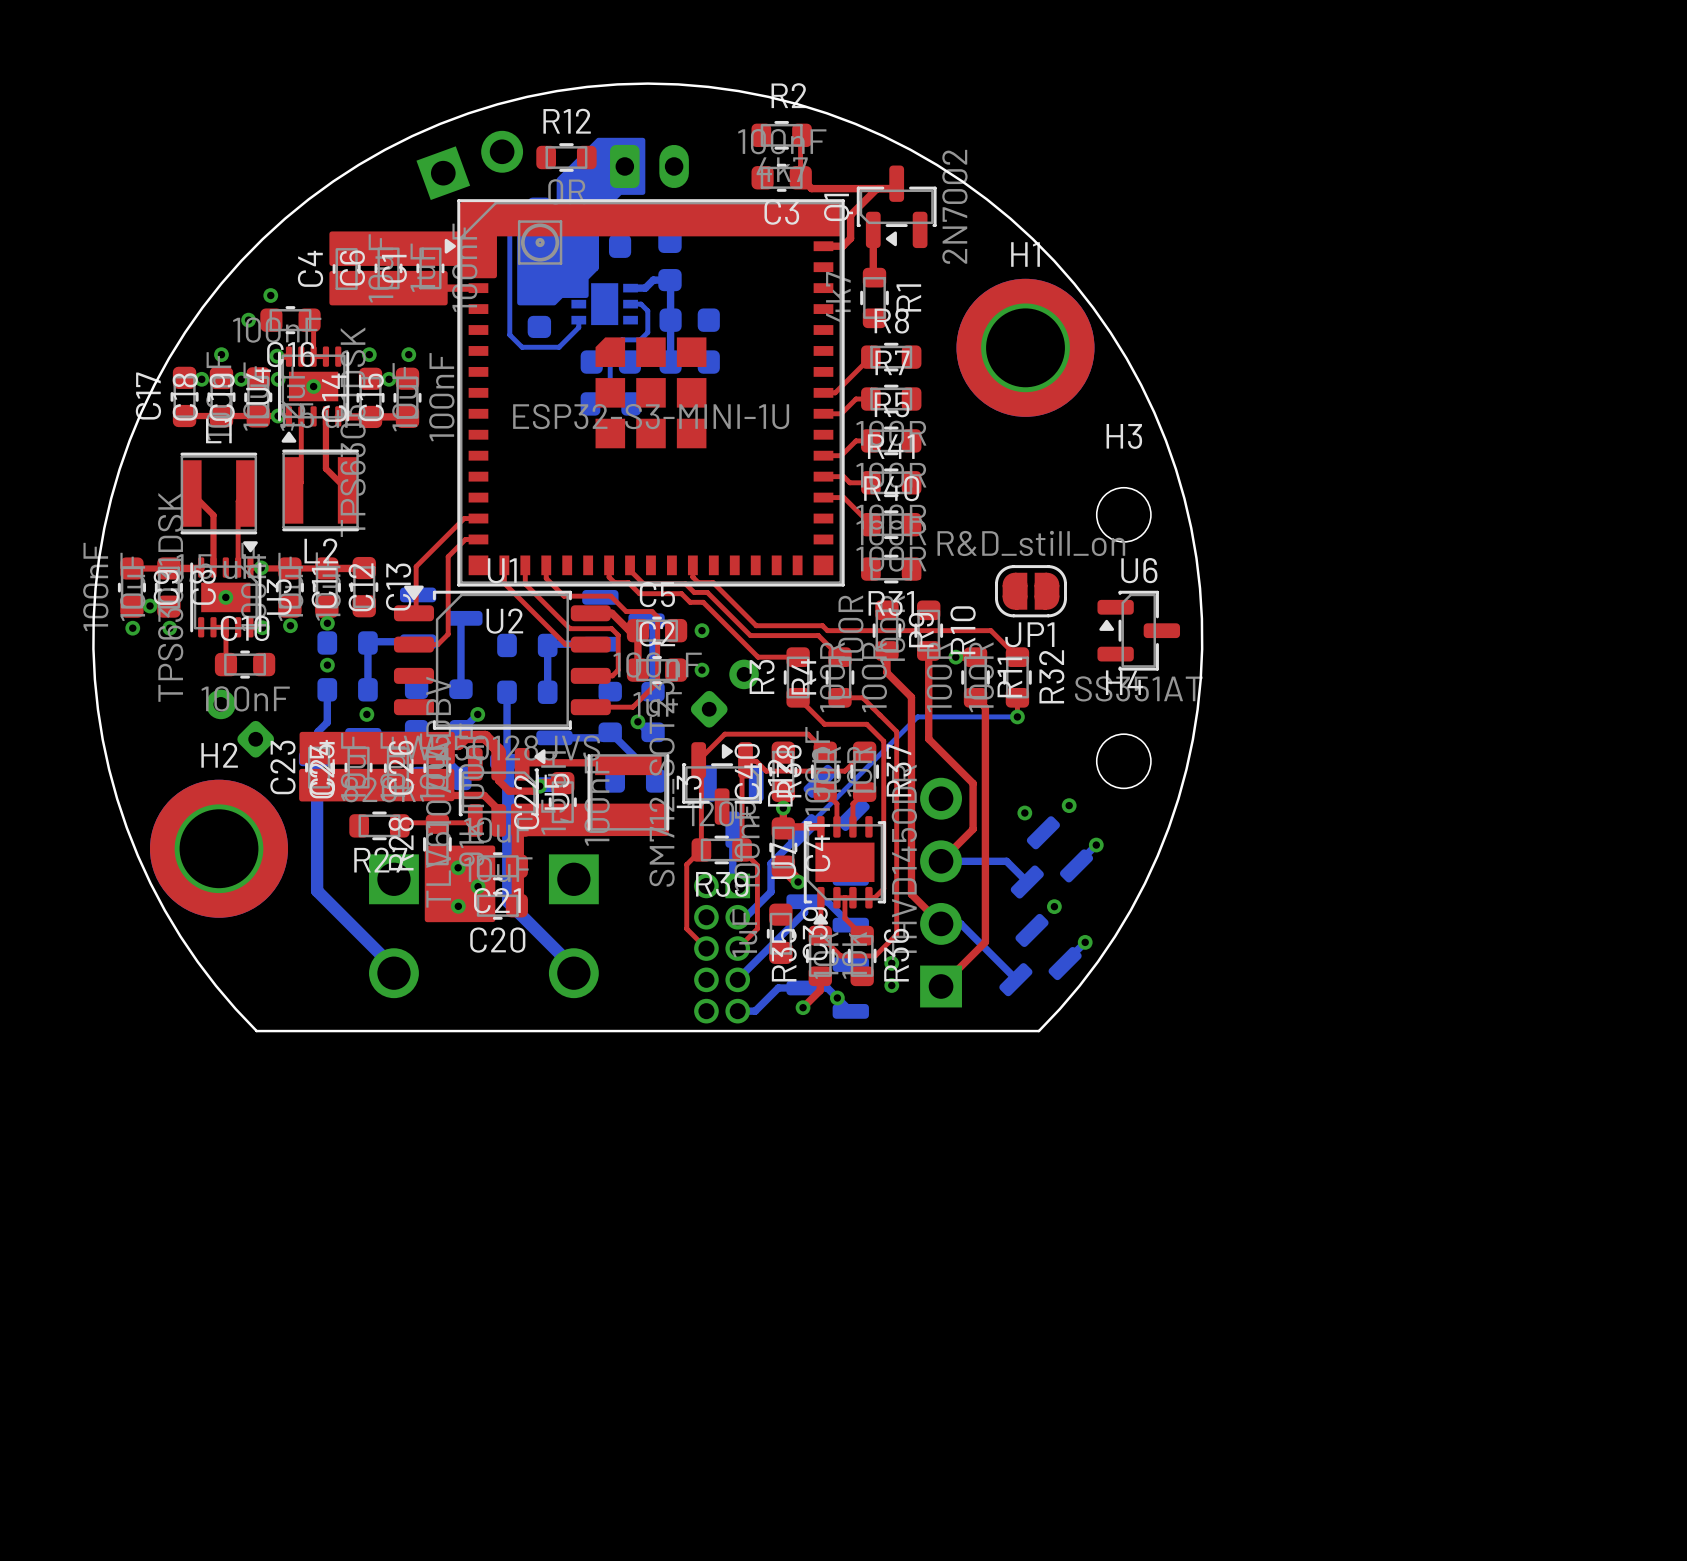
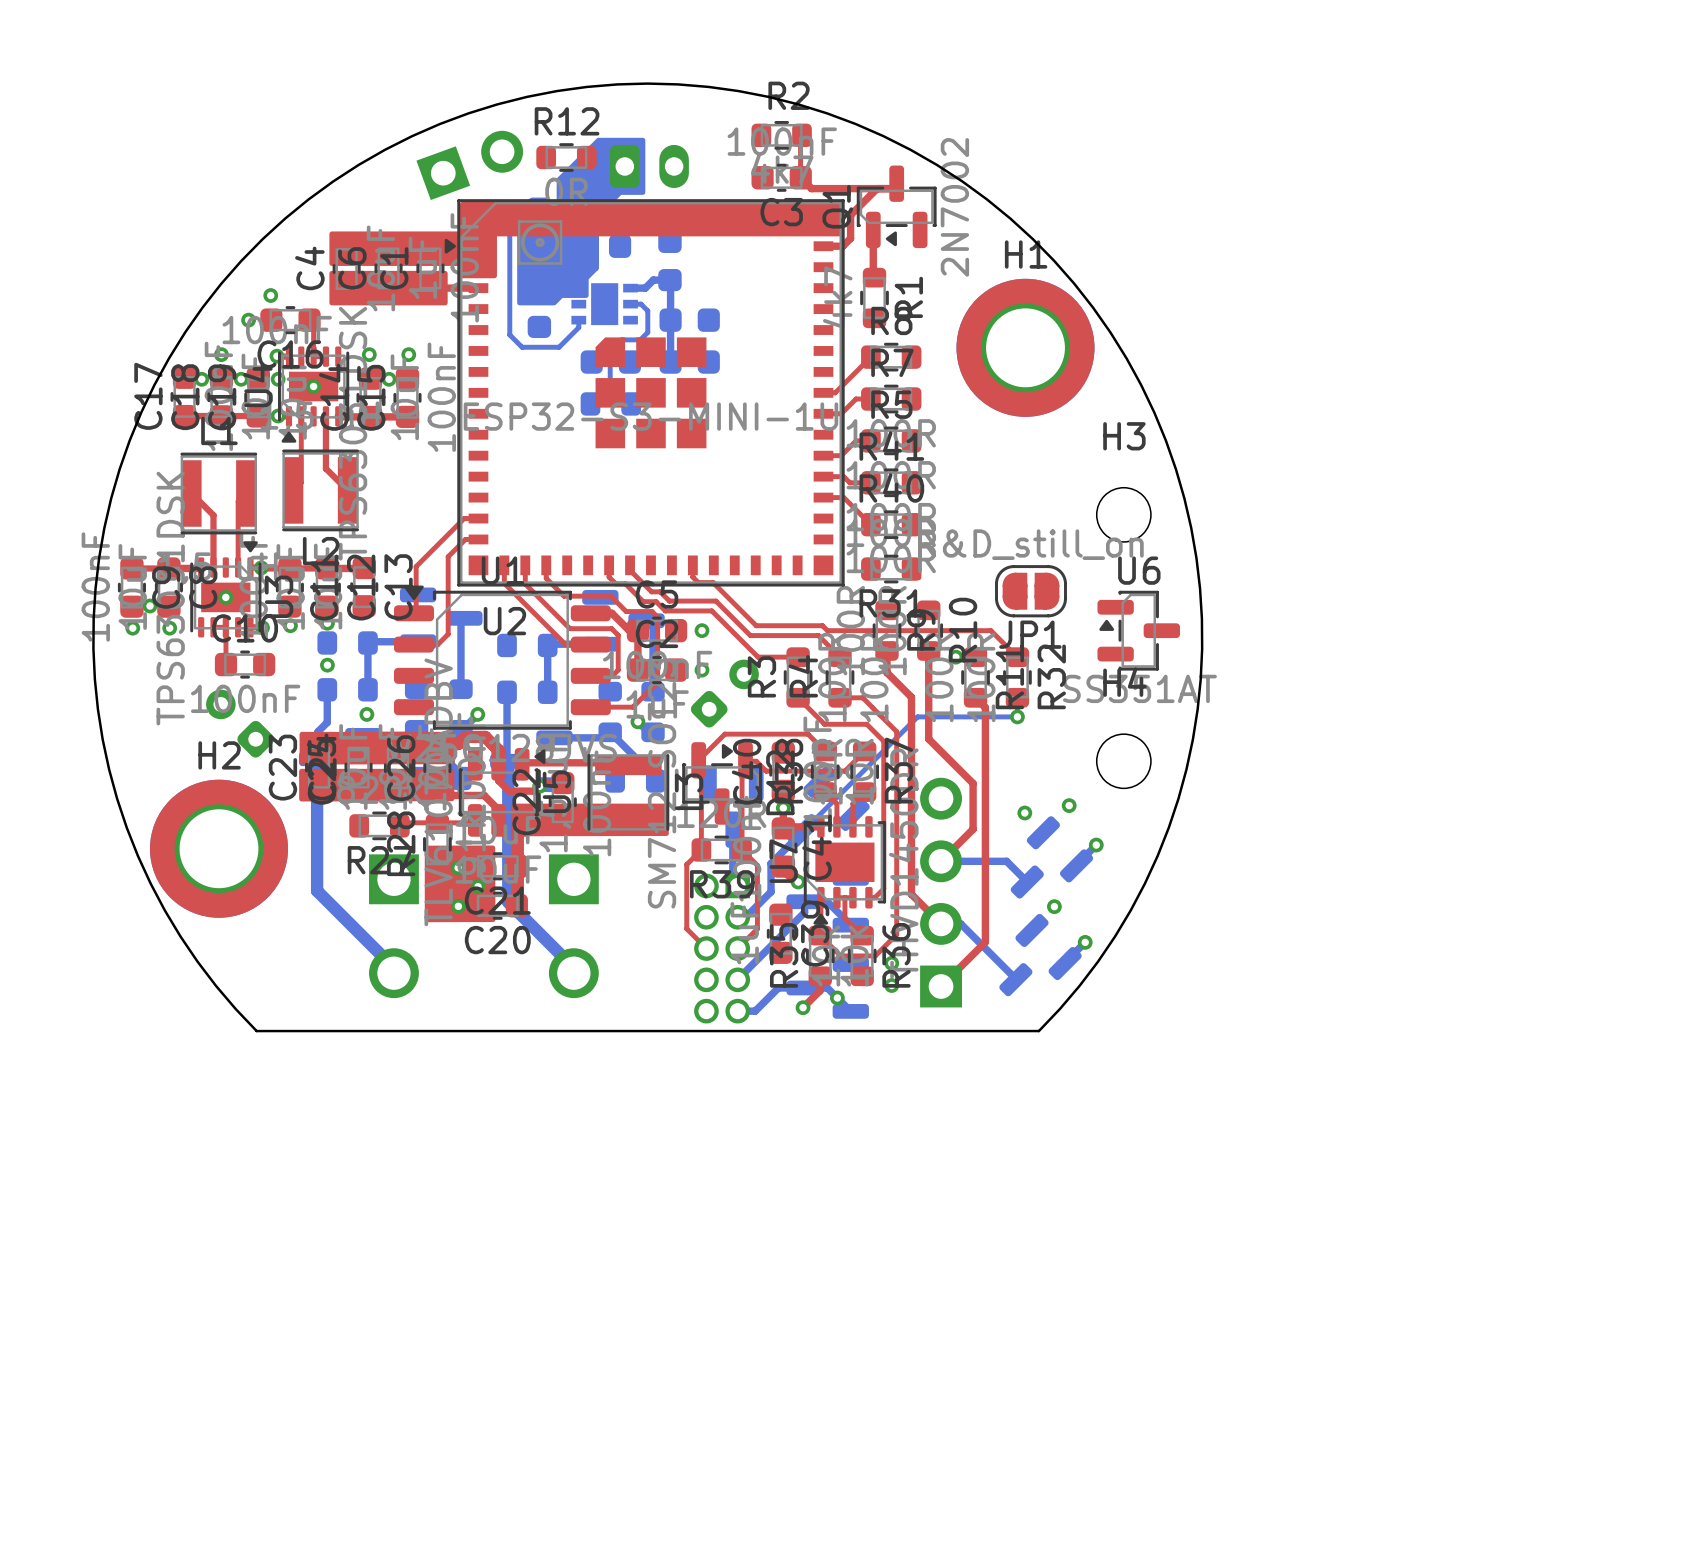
top track: (614, 582) (628, 582) (639, 593) (681, 593) (690, 602) (703, 602) (711, 610) -> (614, 582) (625, 583) (643, 601) (656, 601) (665, 610) (711, 610)
top track: (643, 583) (685, 583) (694, 592) (707, 592) (715, 601) -> (643, 583) (651, 591) (660, 591) (669, 601) (715, 601)

